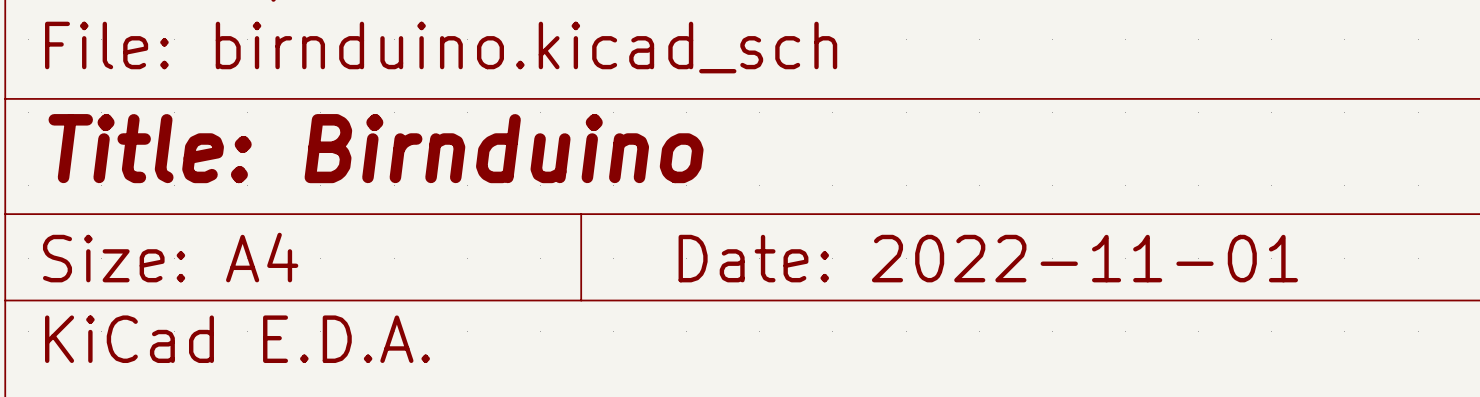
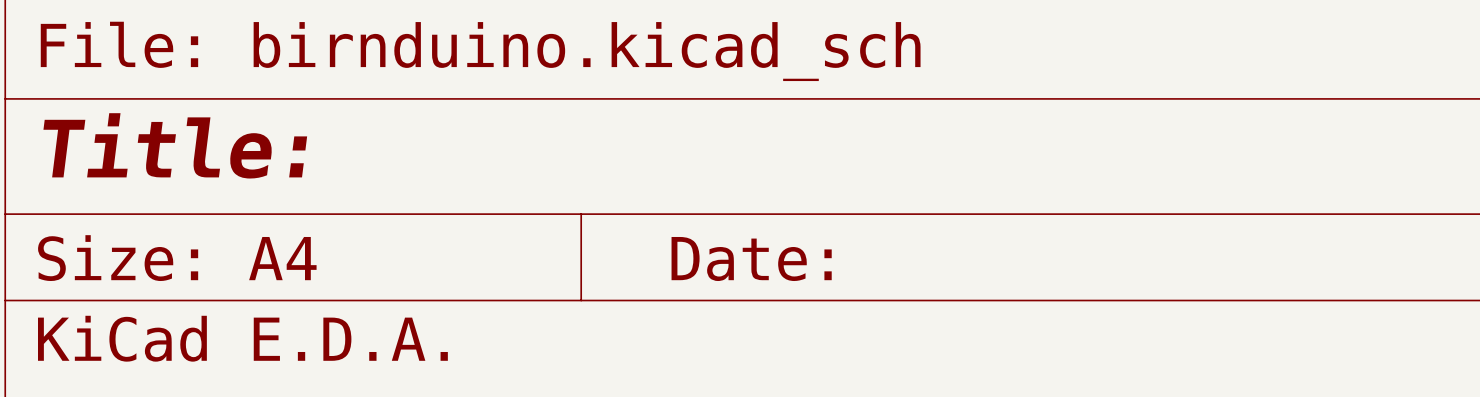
title block: Title: Birnduino (376, 148) -> Title: (175, 145)
title block: Date: 2022-11-01 (988, 258) -> Date: (751, 259)

